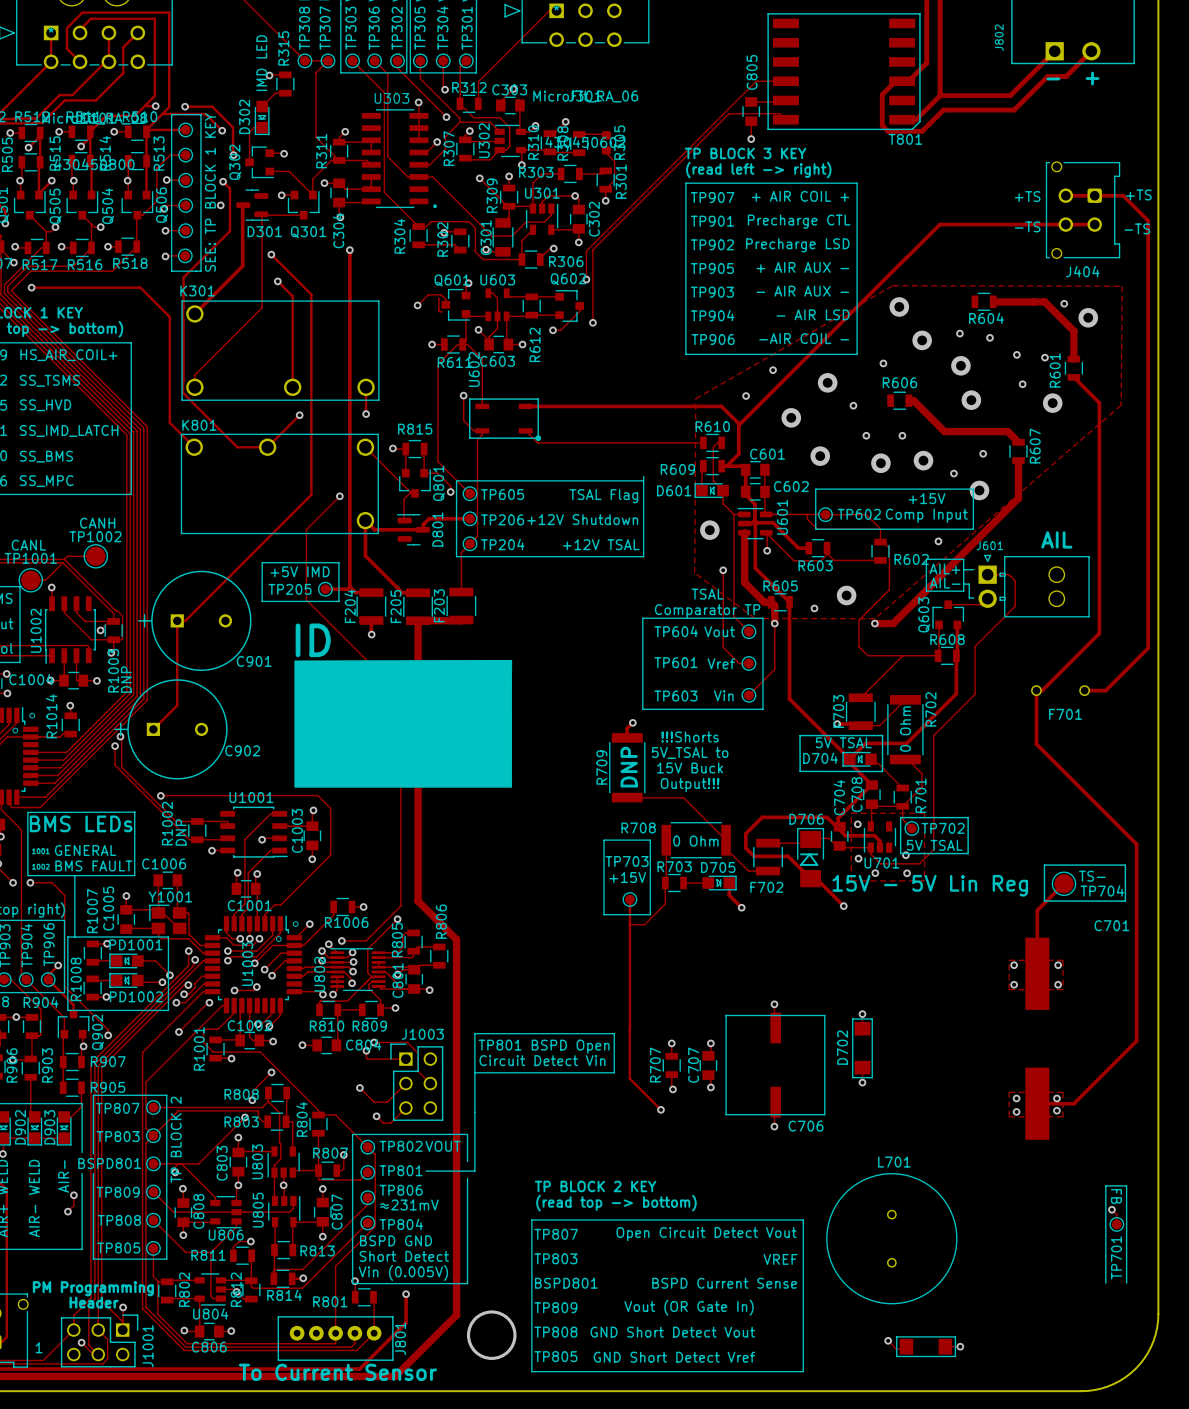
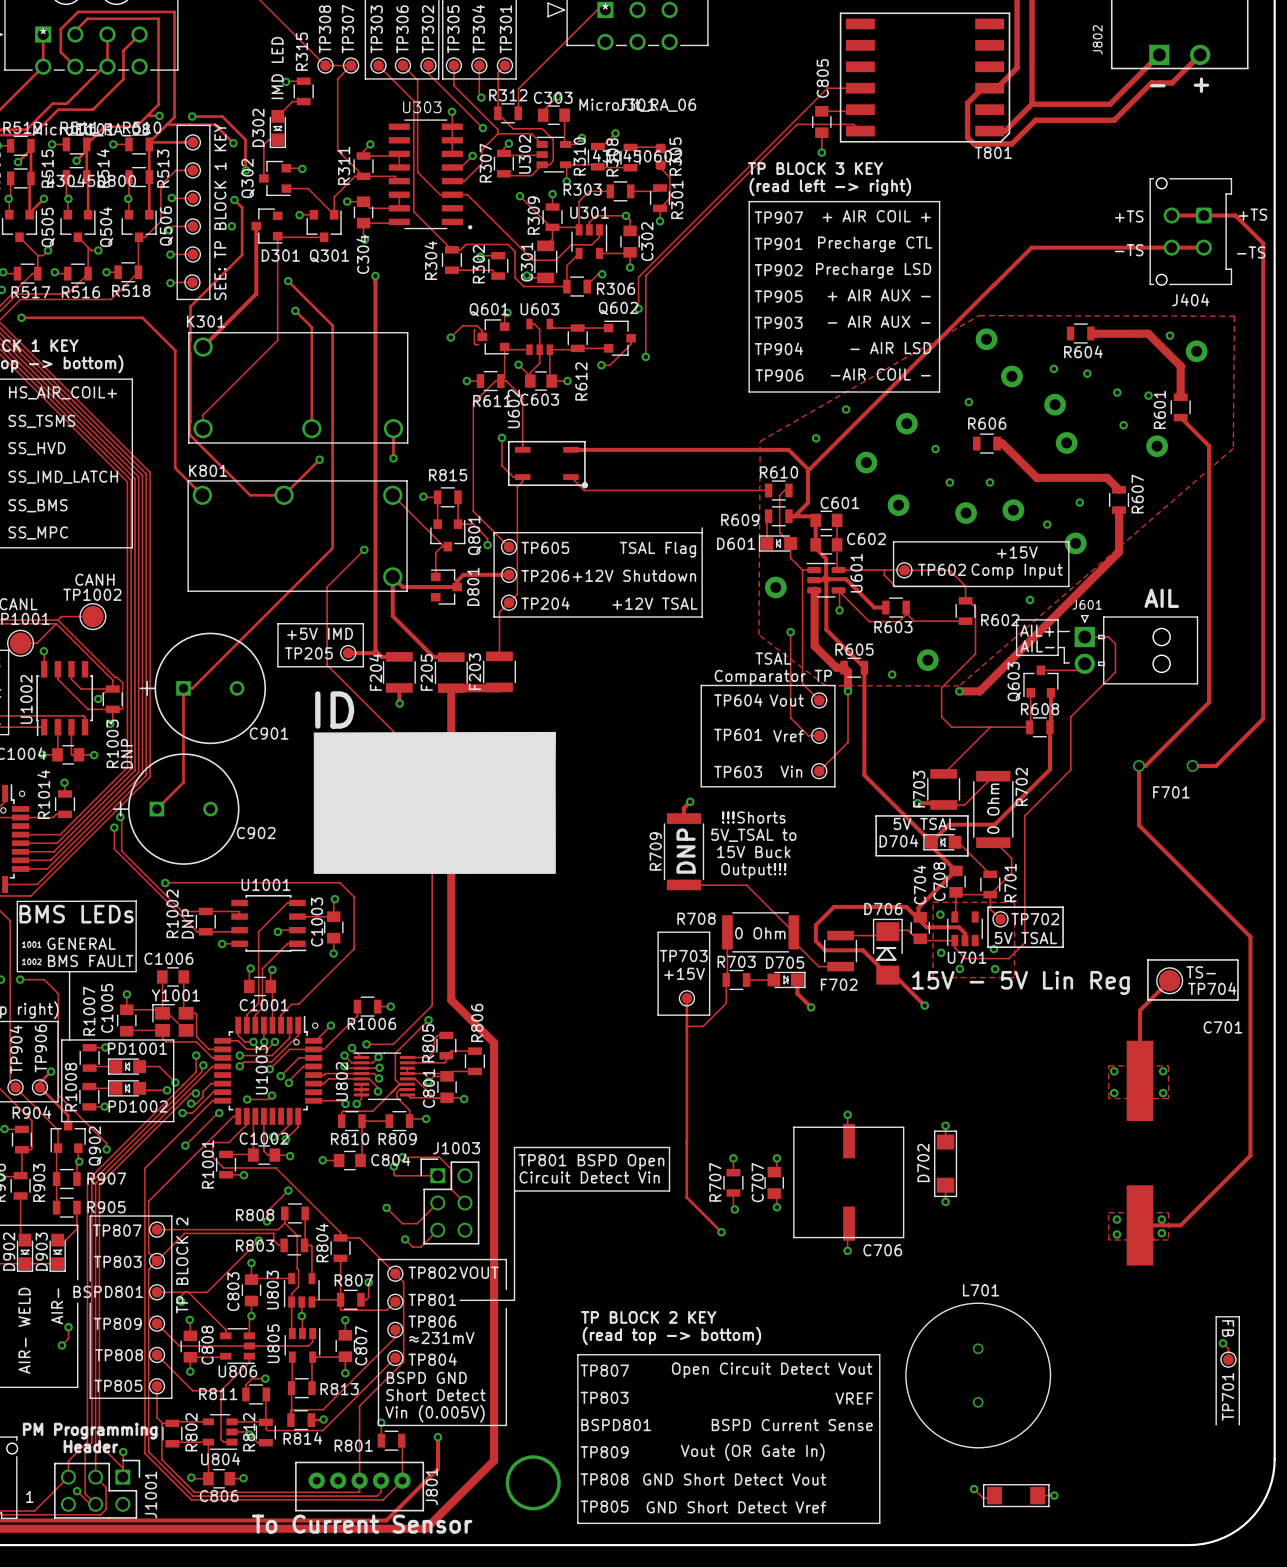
D301 footprint: [236, 189, 270, 221] -> [251, 208, 283, 244]
D801 footprint: [397, 514, 430, 546] -> [430, 569, 463, 605]

